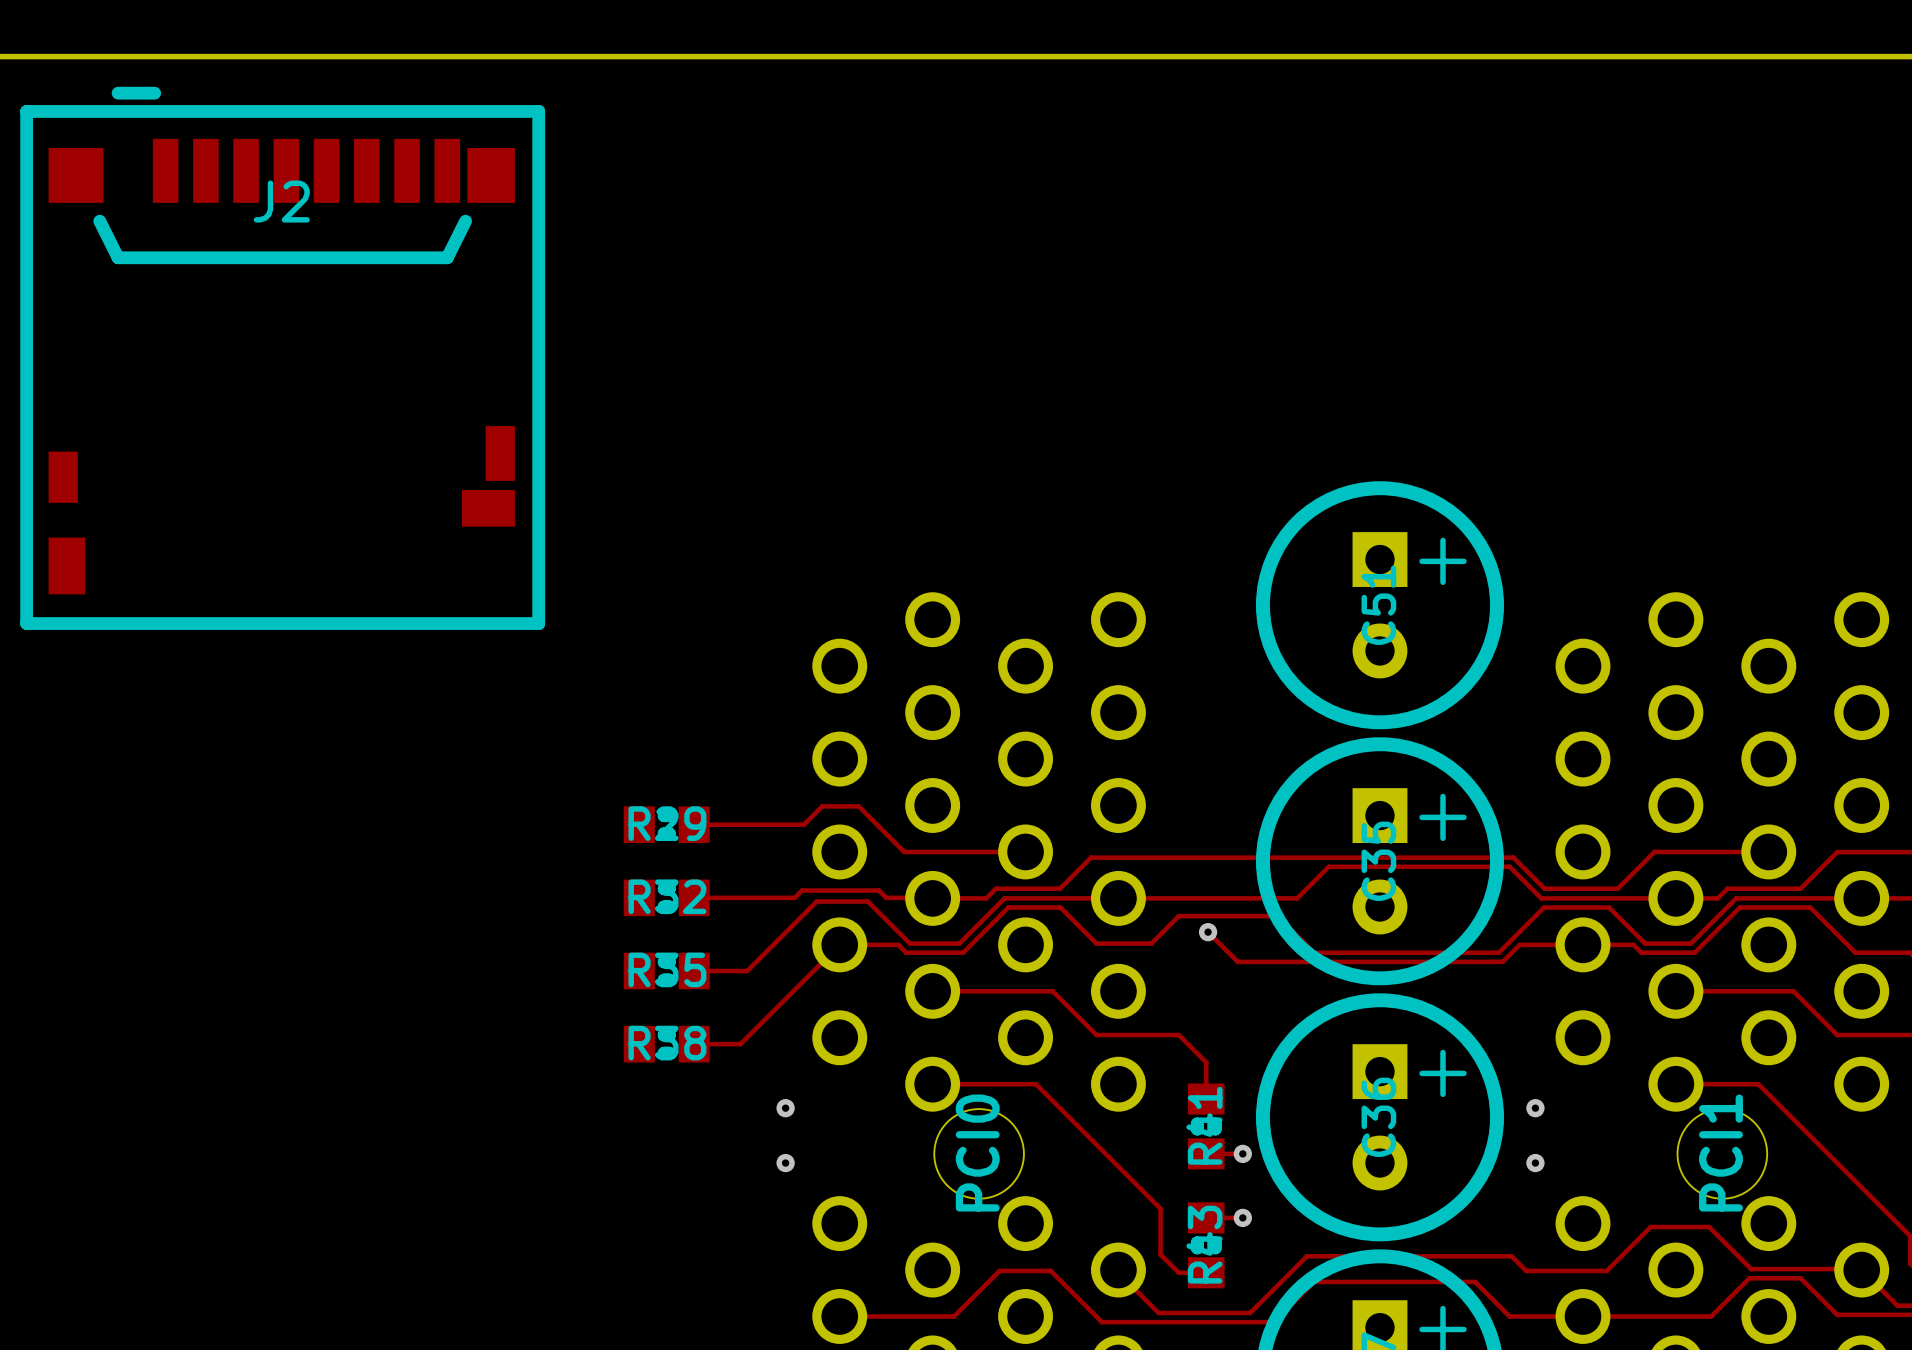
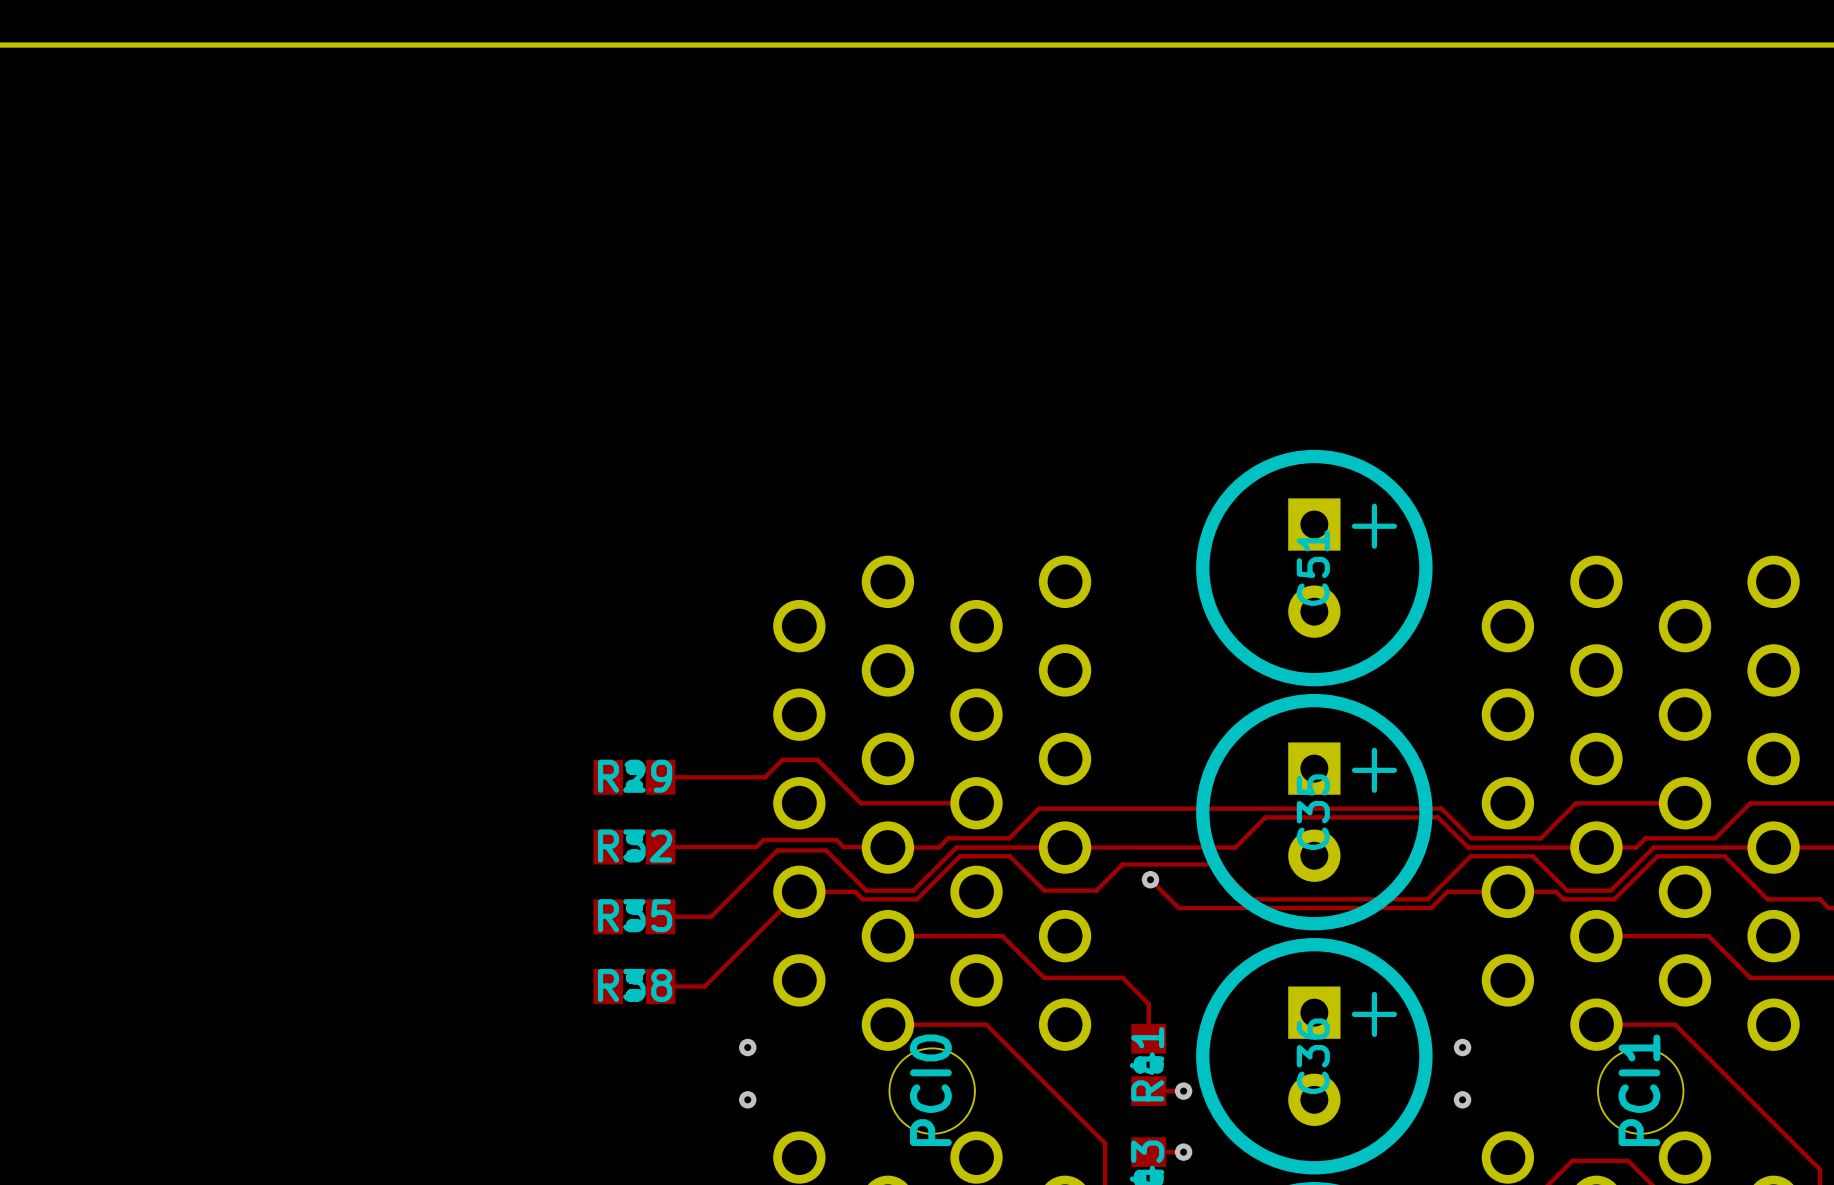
J2: (282, 358) -> none

